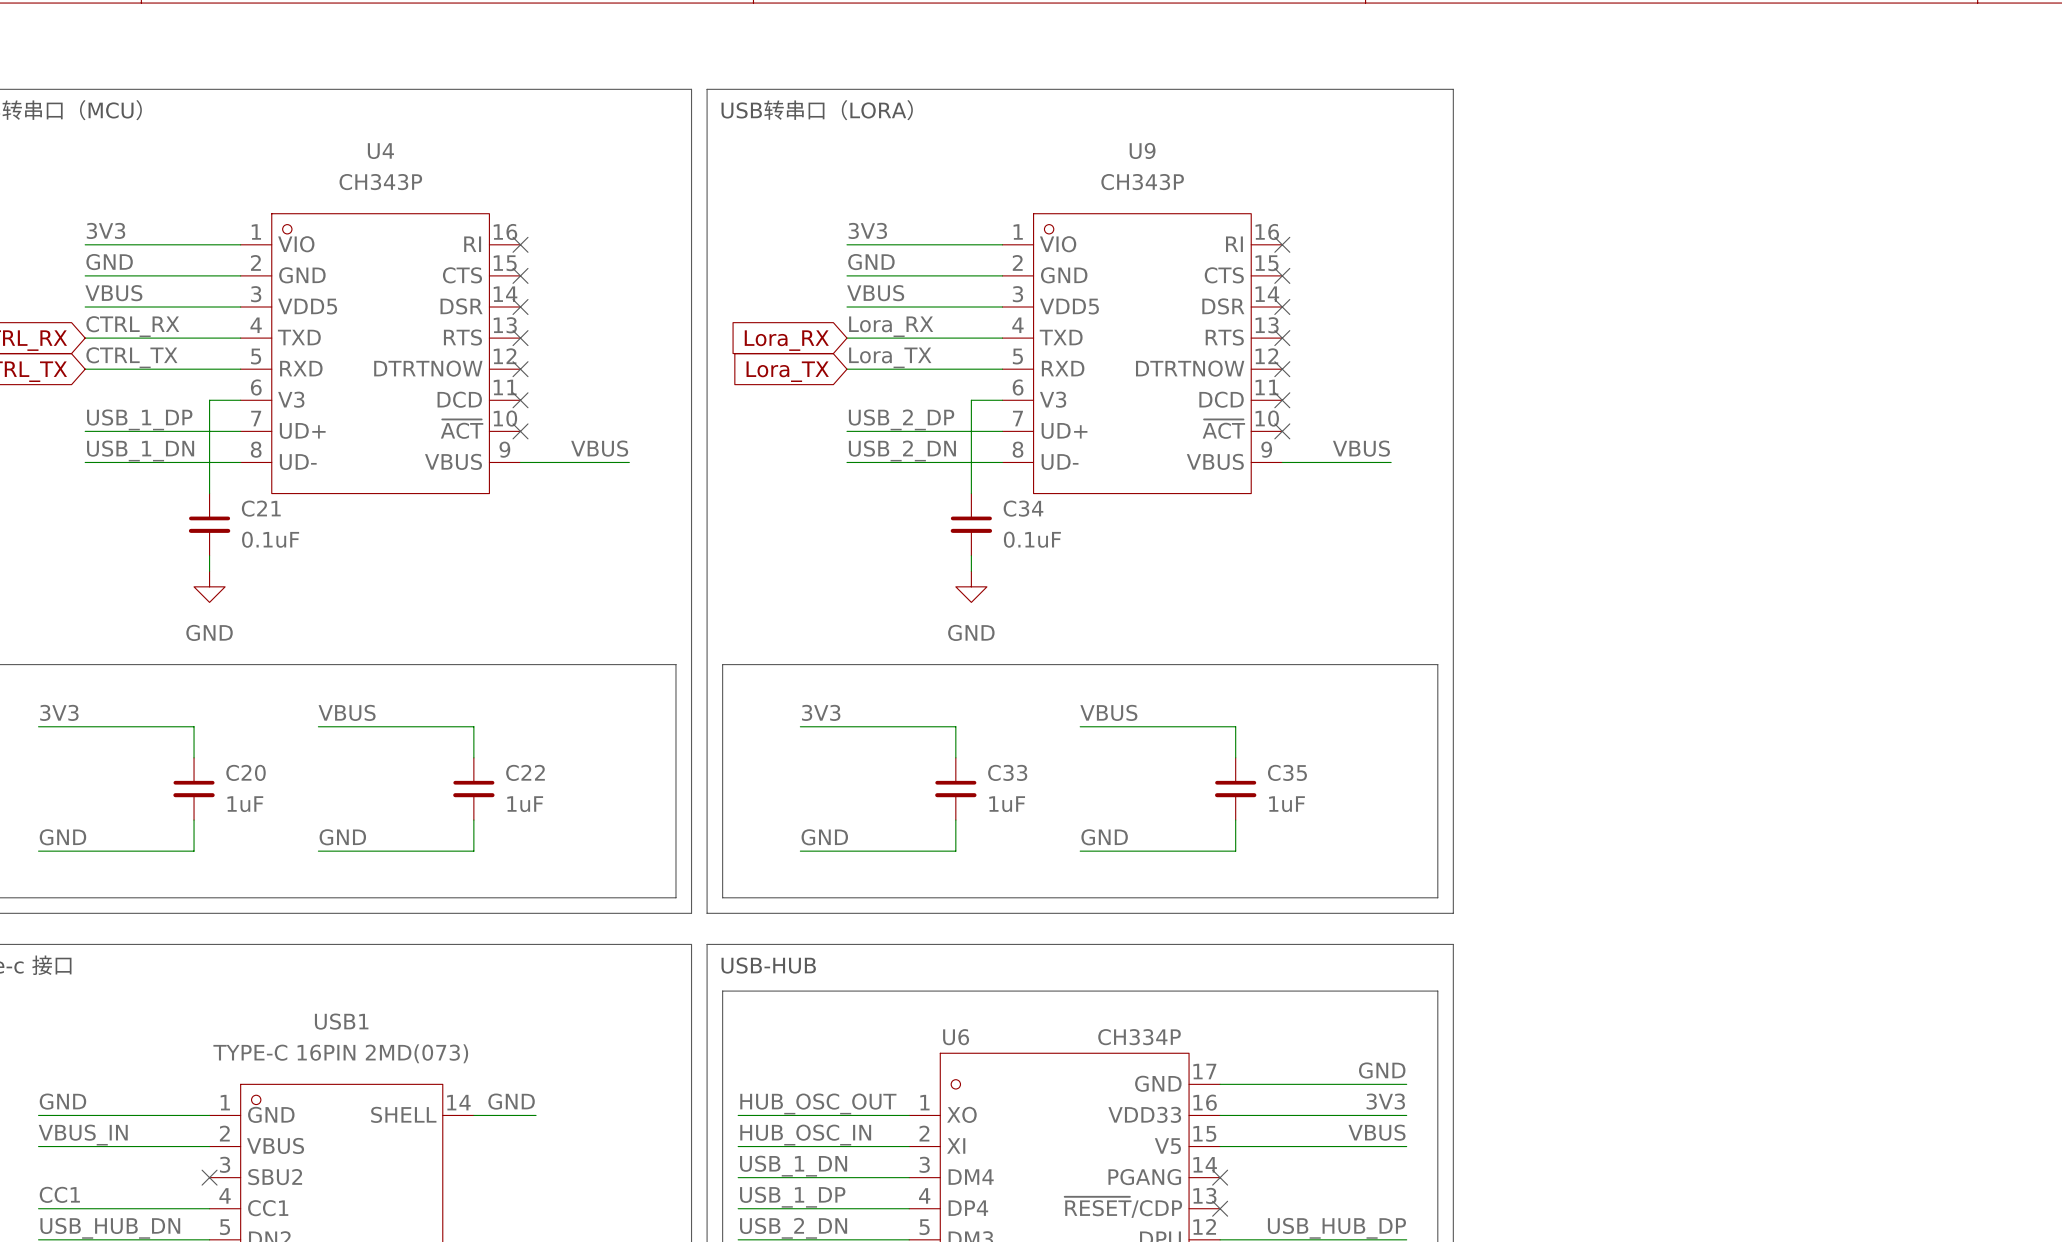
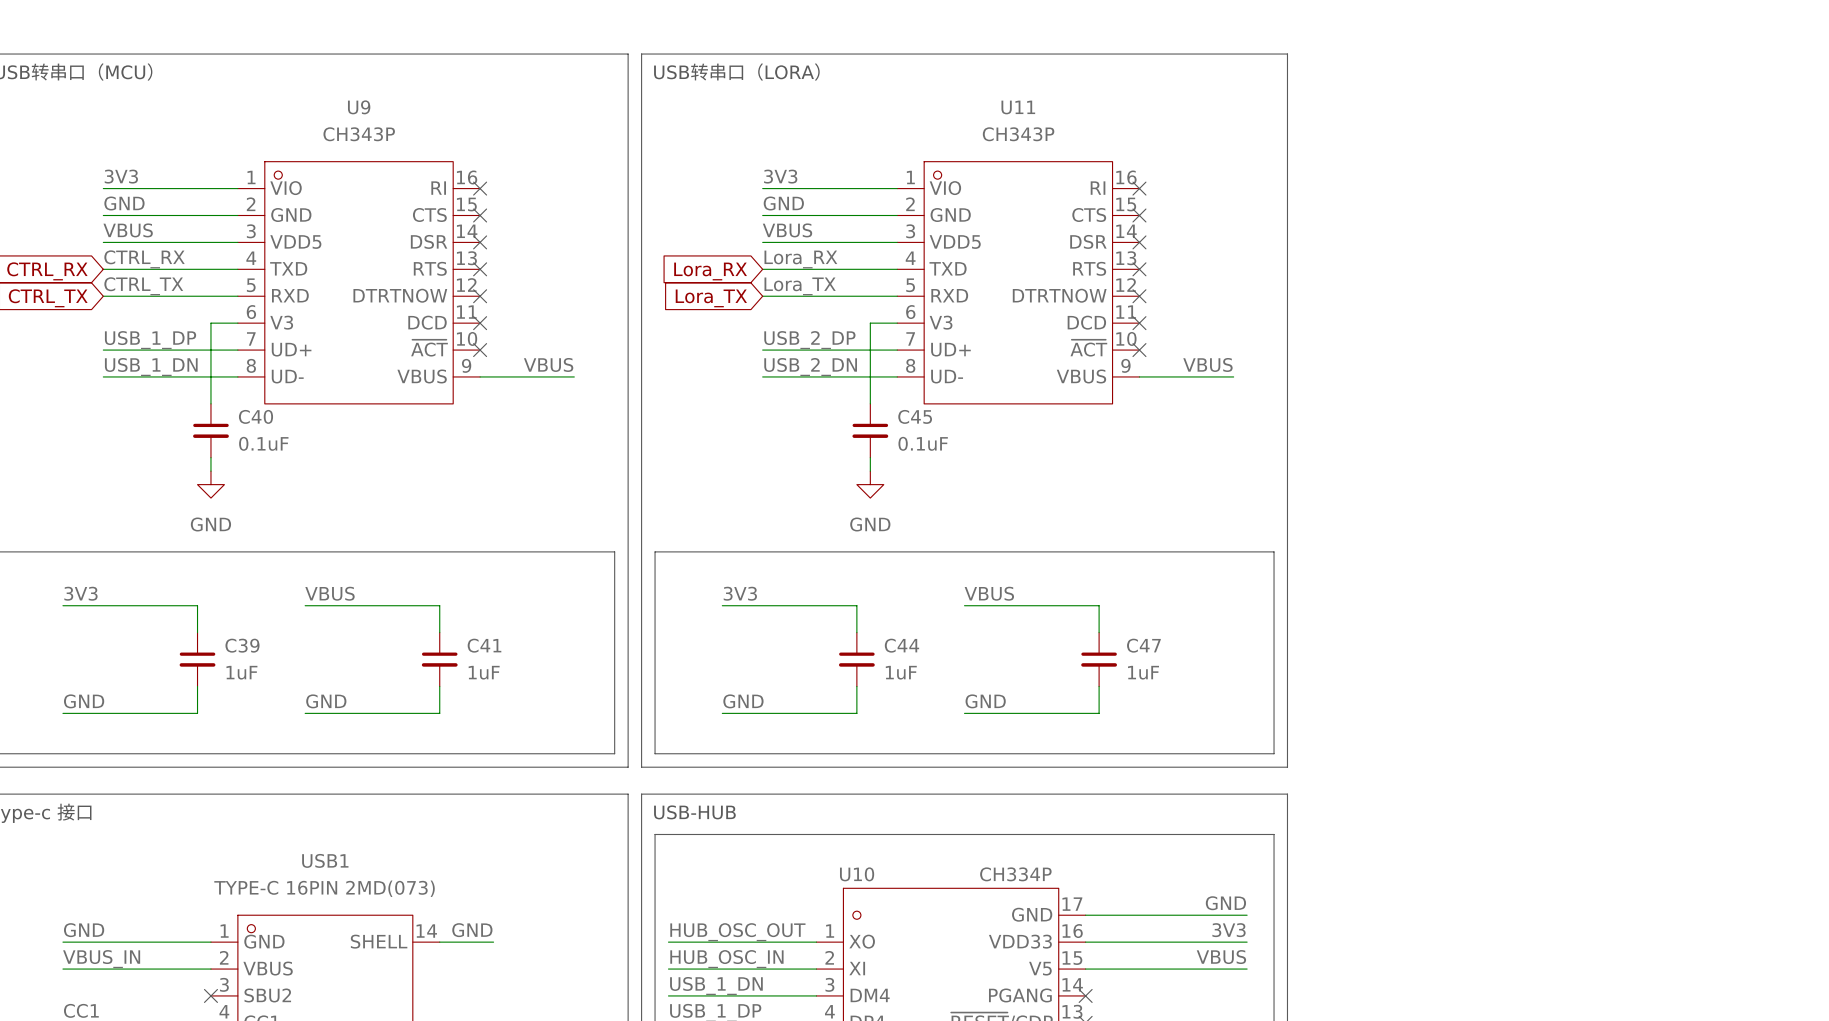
U9 name: U9 (1142, 150) -> U11 (1018, 107)
U4 name: U4 (380, 151) -> U9 (359, 107)
C21 name: C21 (261, 508) -> C40 (255, 416)
C34 name: C34 (1023, 508) -> C45 (915, 416)
C20 name: C20 (246, 772) -> C39 (242, 645)
C22 name: C22 (525, 772) -> C41 (484, 645)
C33 name: C33 (1007, 772) -> C44 (901, 645)
C35 name: C35 (1287, 772) -> C47 (1143, 645)
U6 name: U6 (956, 1037) -> U10 (857, 874)

